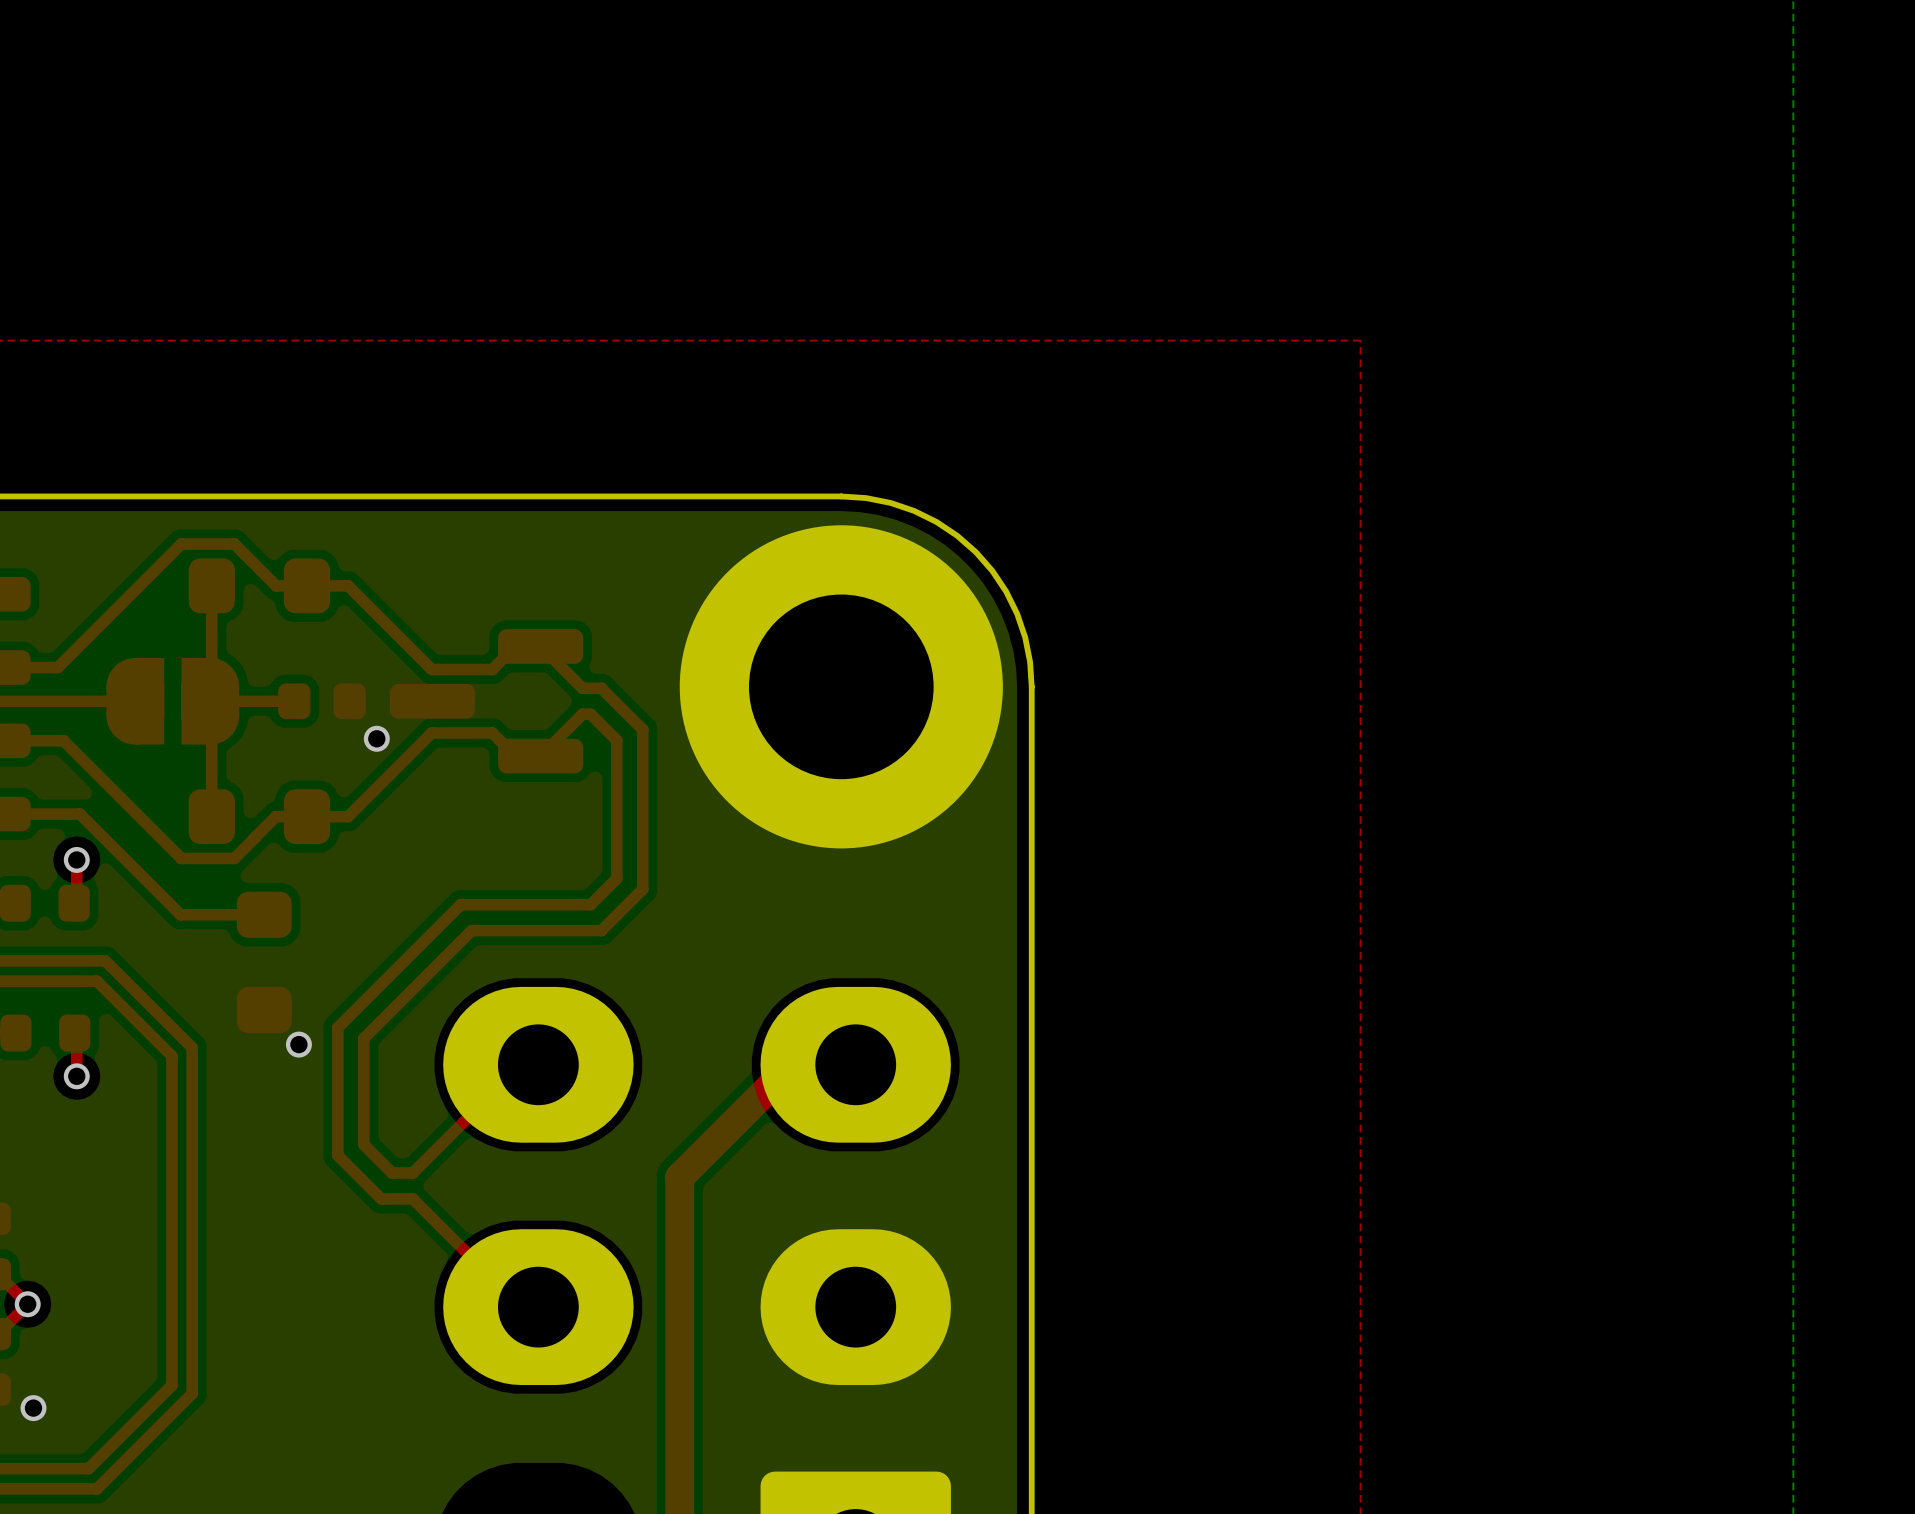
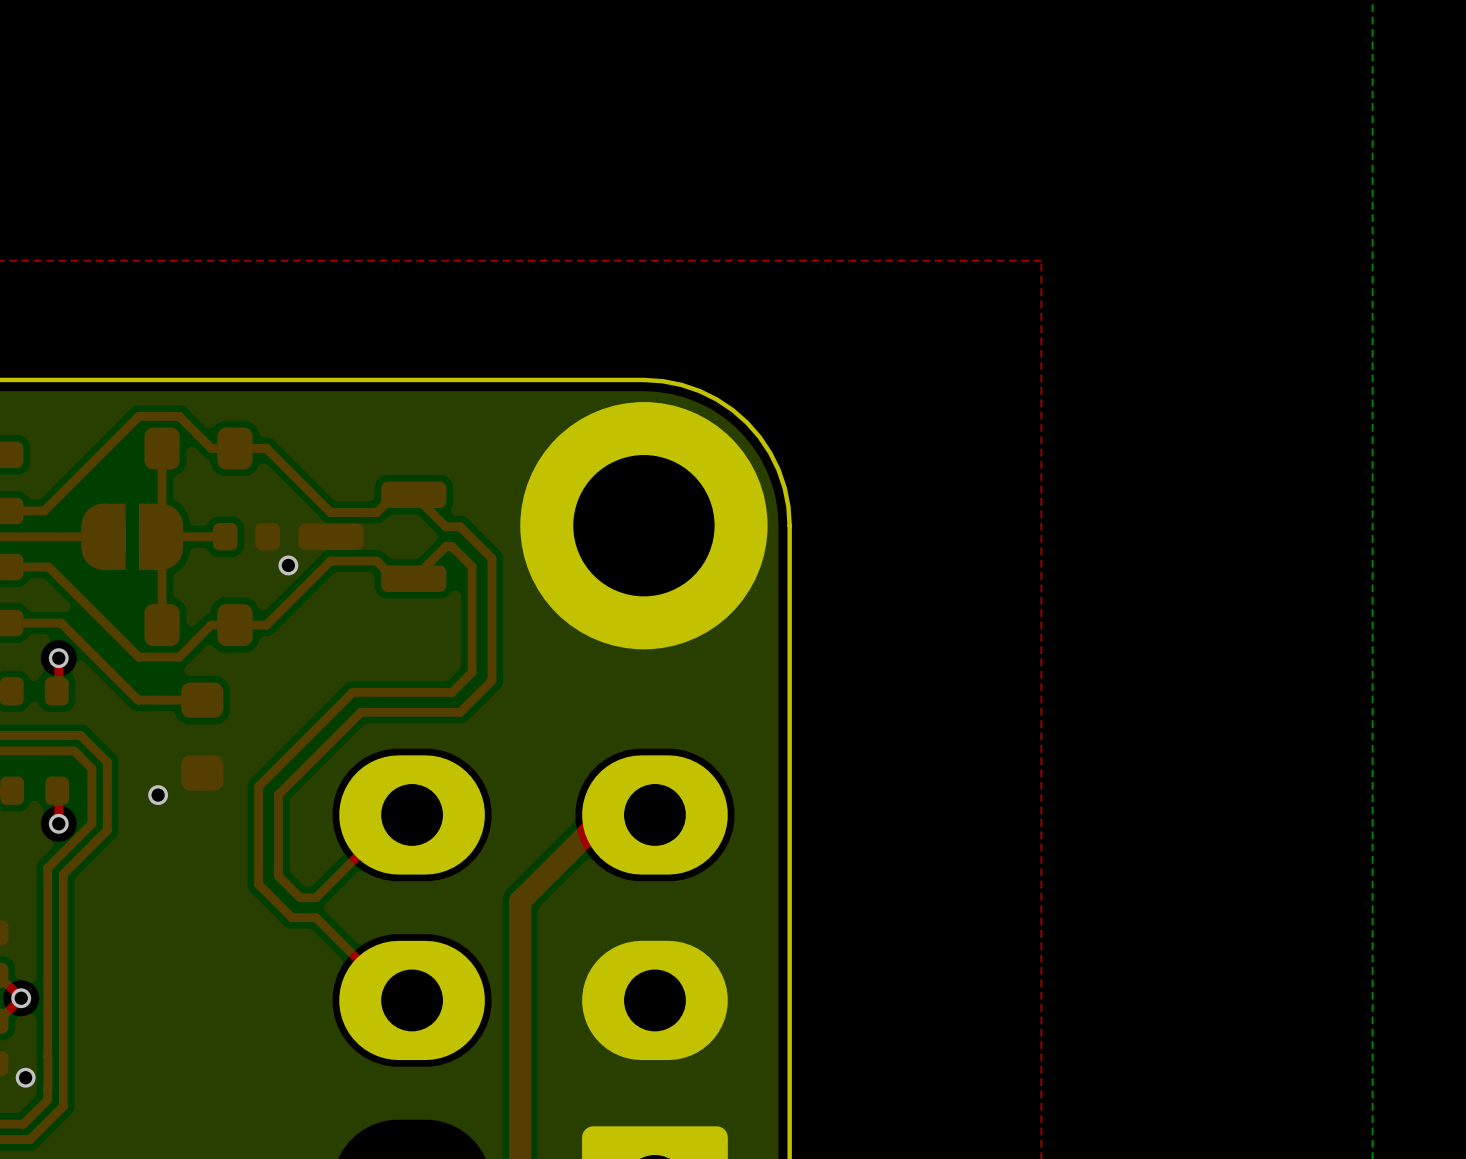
top track: (140, 995) (192, 1047) (192, 1393) (96, 1488) (39, 1488) -> (107, 762) (107, 830) (63, 874) (63, 1106) (30, 1139)
top track: (120, 1004) (171, 1056) (171, 1385) (88, 1468) (30, 1468) -> (91, 768) (91, 823) (47, 867) (47, 1099) (23, 1124)
via position: (298, 1044) -> (158, 795)

